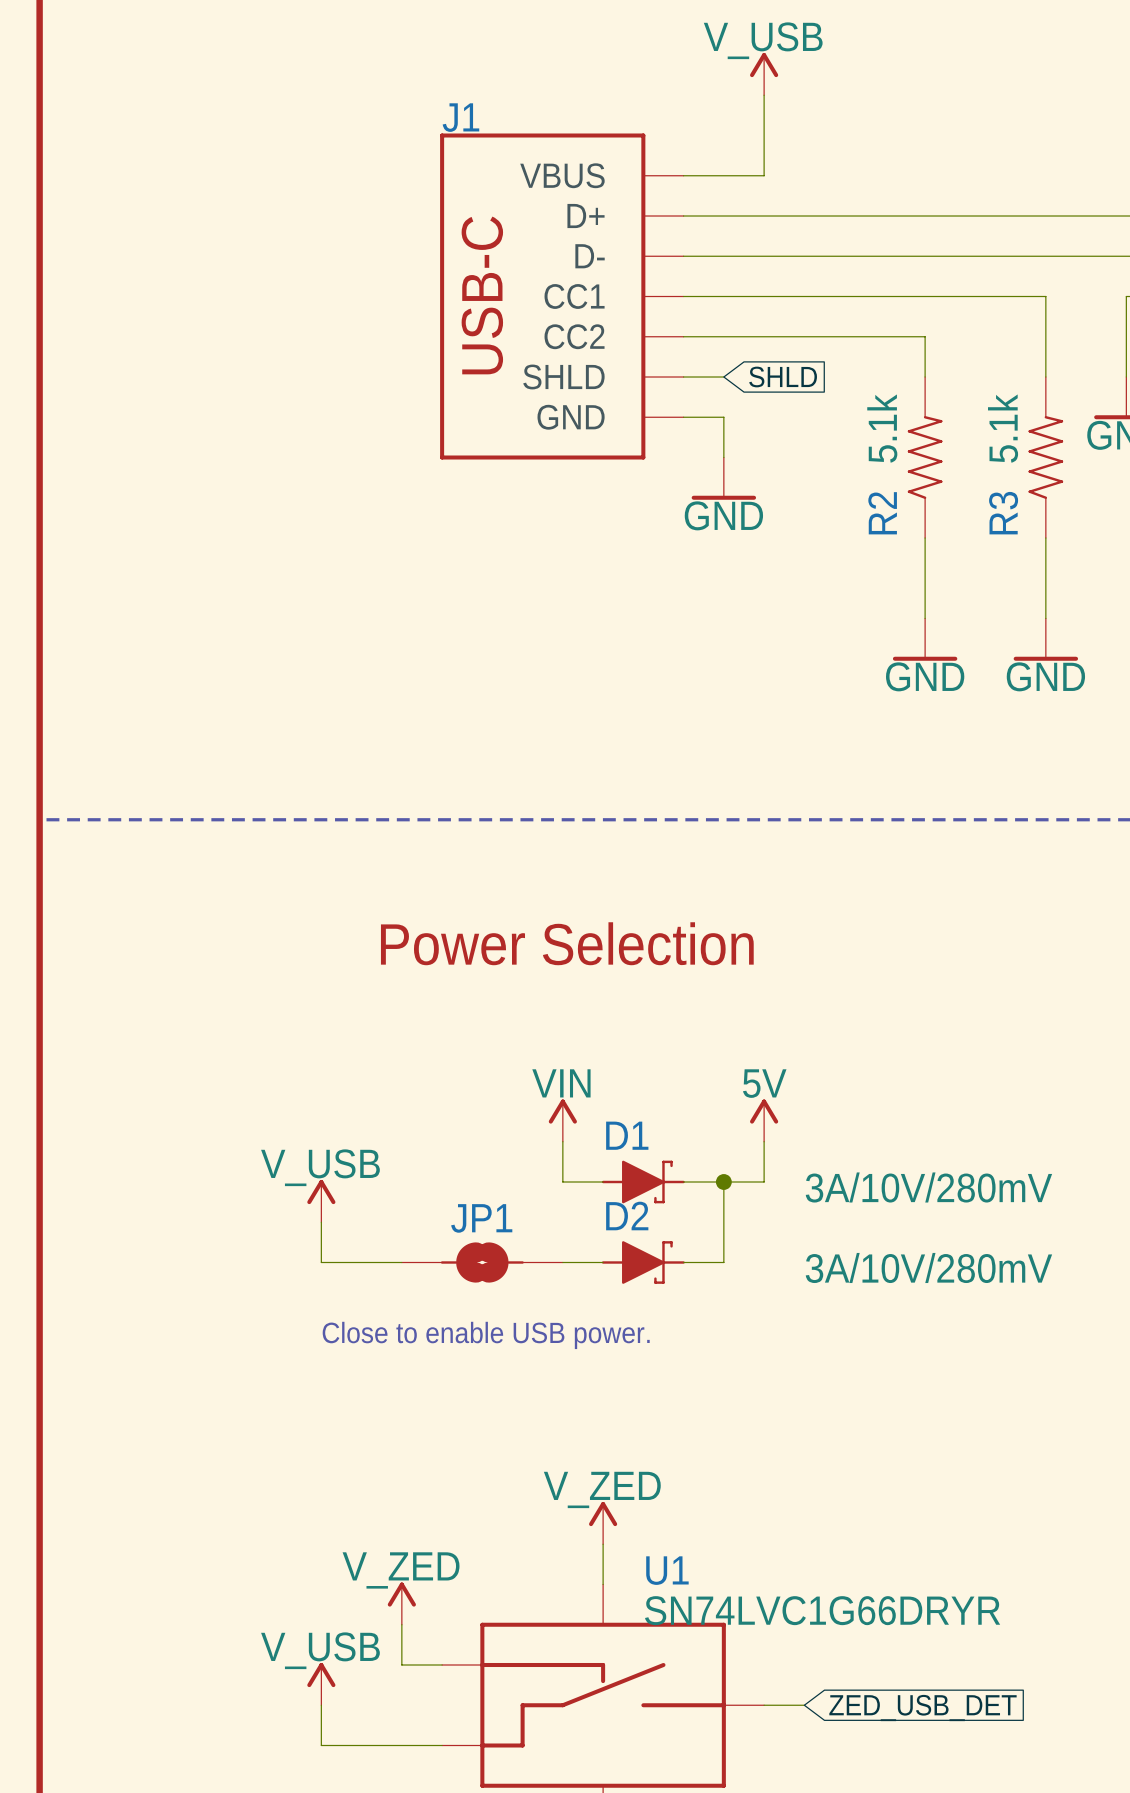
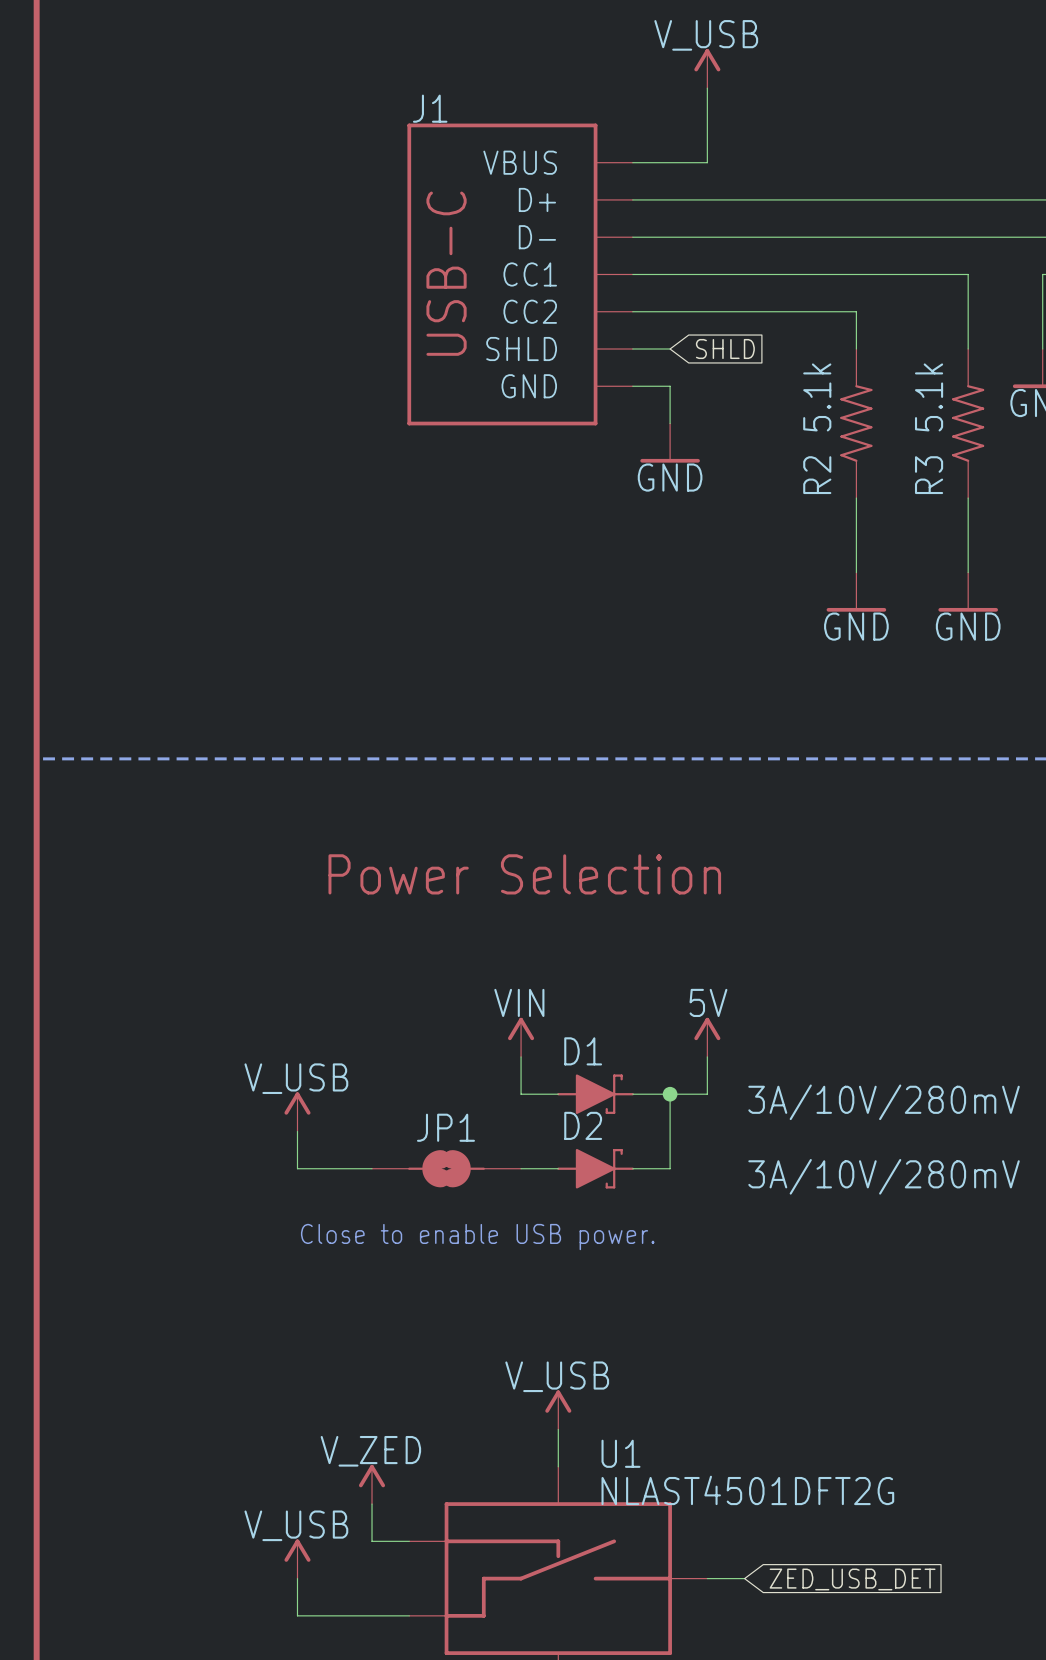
power symbol: V_ZED (603, 1523) -> V_USB (558, 1409)
U1 value: SN74LVC1G66DRYR (822, 1610) -> NLAST4501DFT2G (747, 1490)

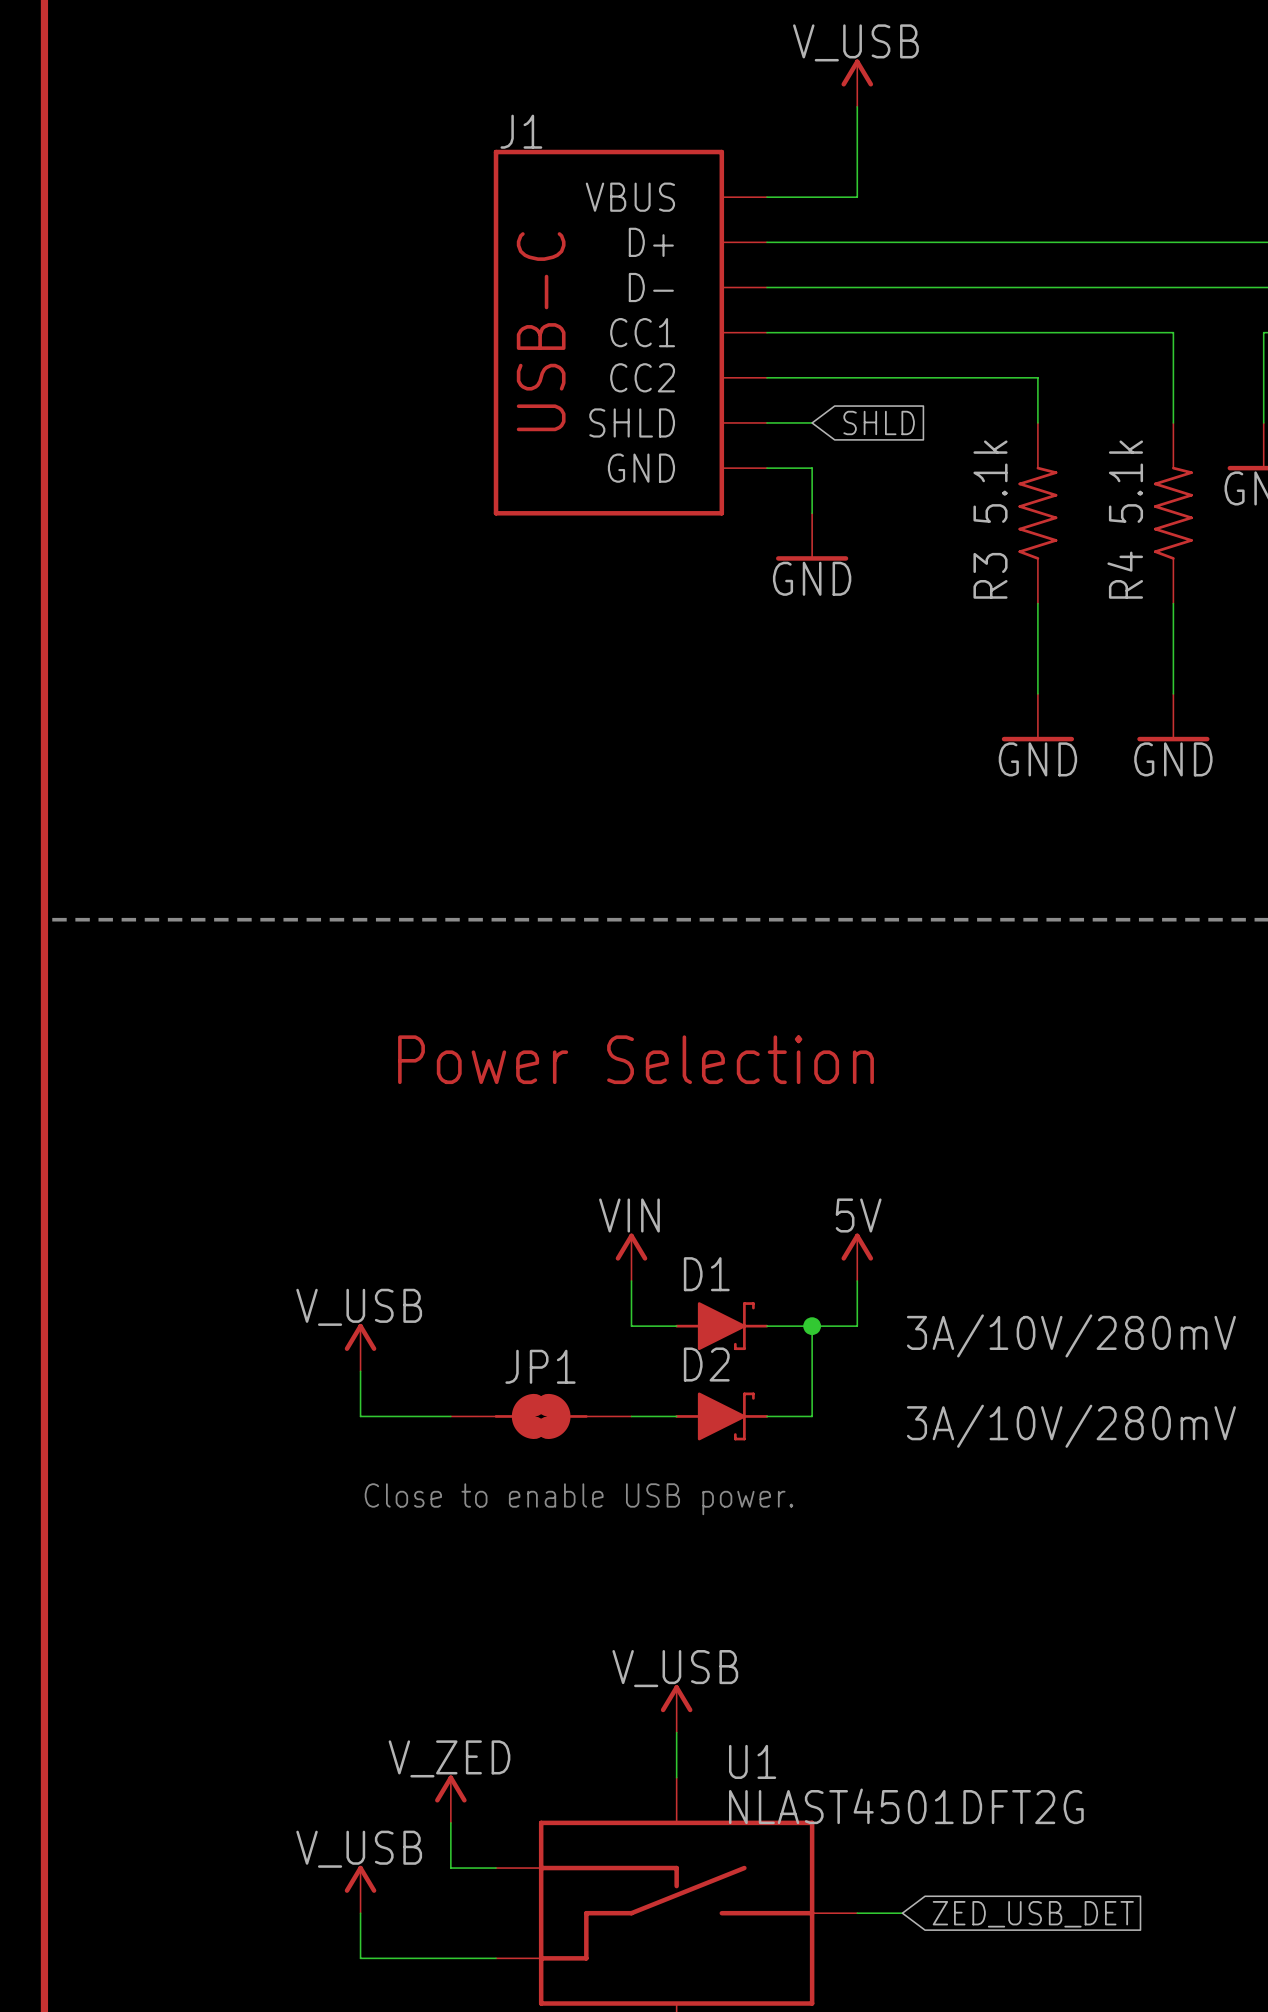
R2 name: R2 (817, 475) -> R3 (990, 575)
R3 name: R3 (929, 475) -> R4 (1125, 575)

